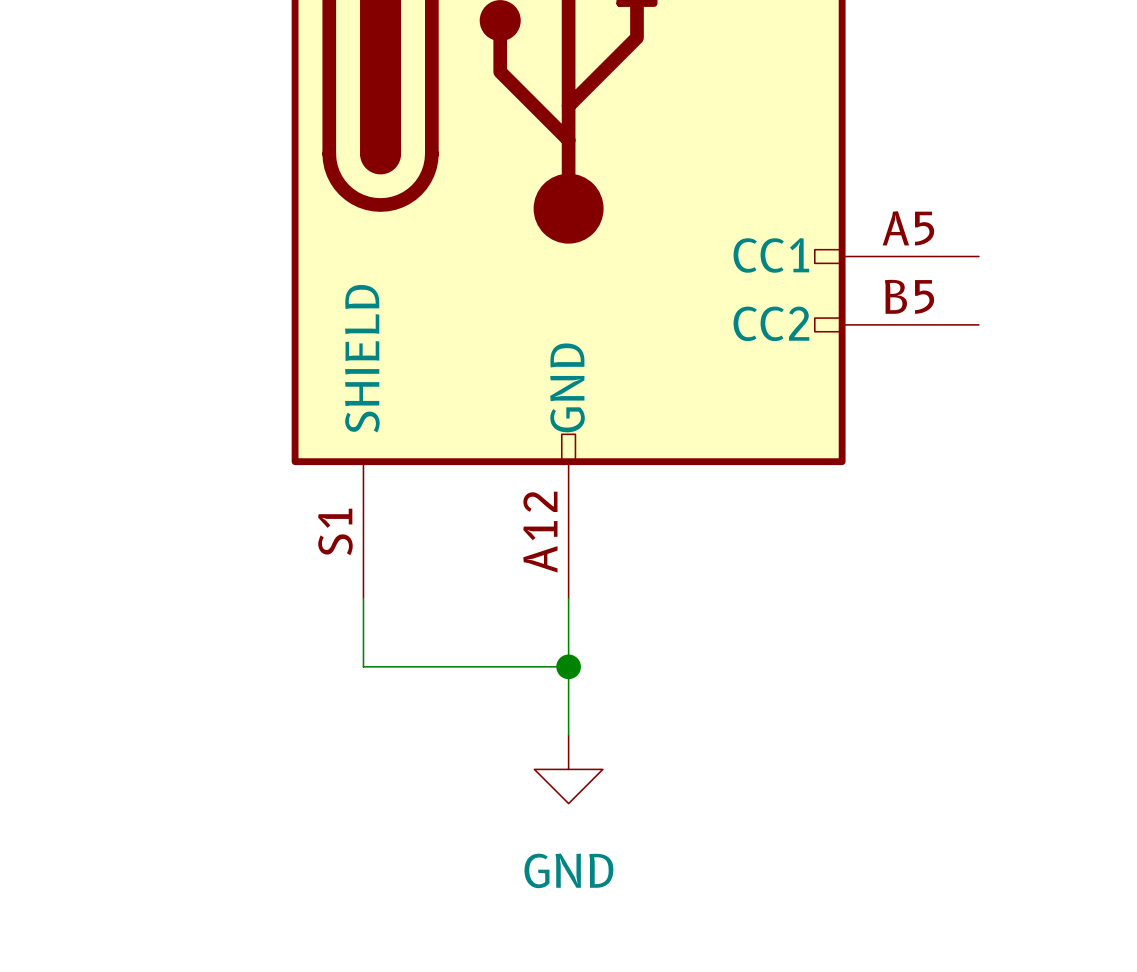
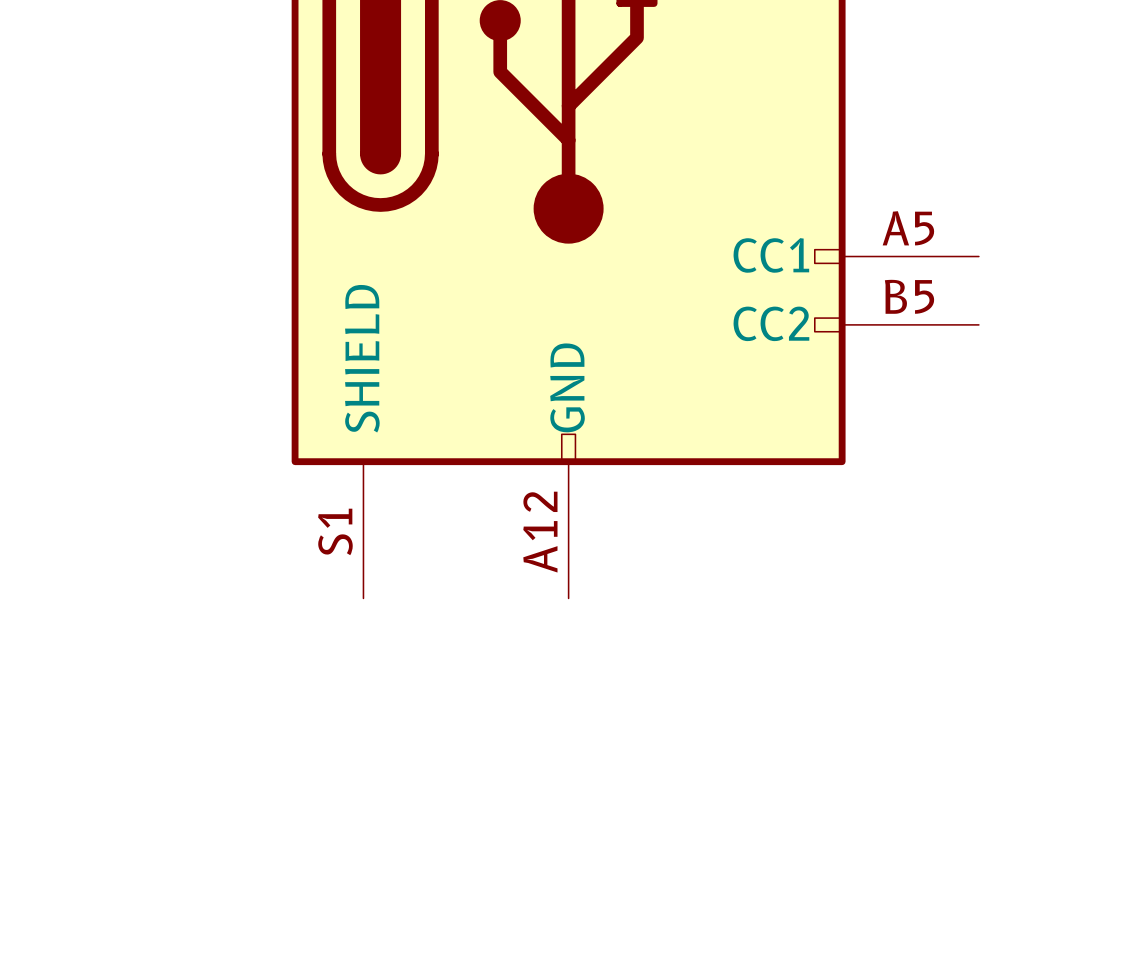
wire: (363, 598) (363, 666) (568, 666) -> none
wire: (568, 598) (568, 735) -> none
junction: (568, 666) -> none
power symbol: GND (568, 769) -> none

